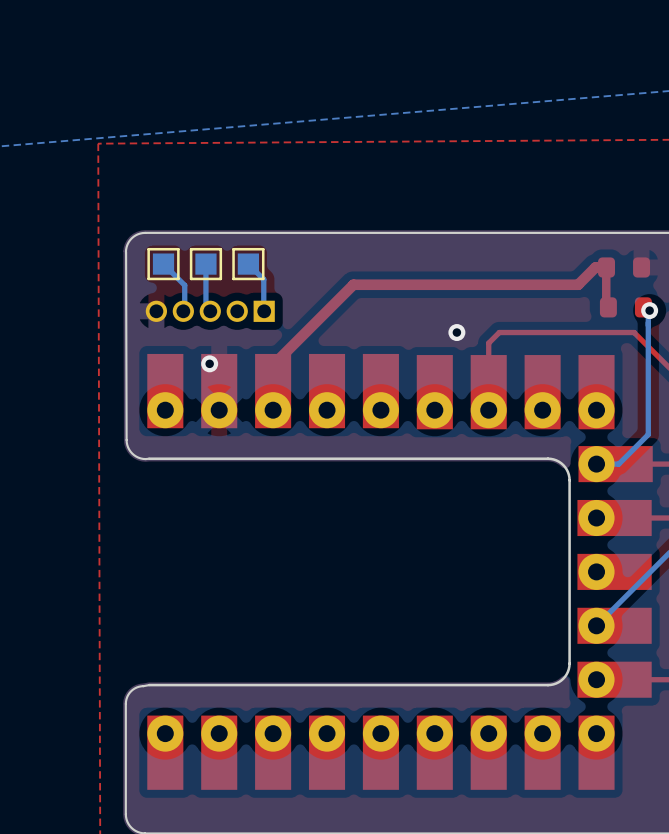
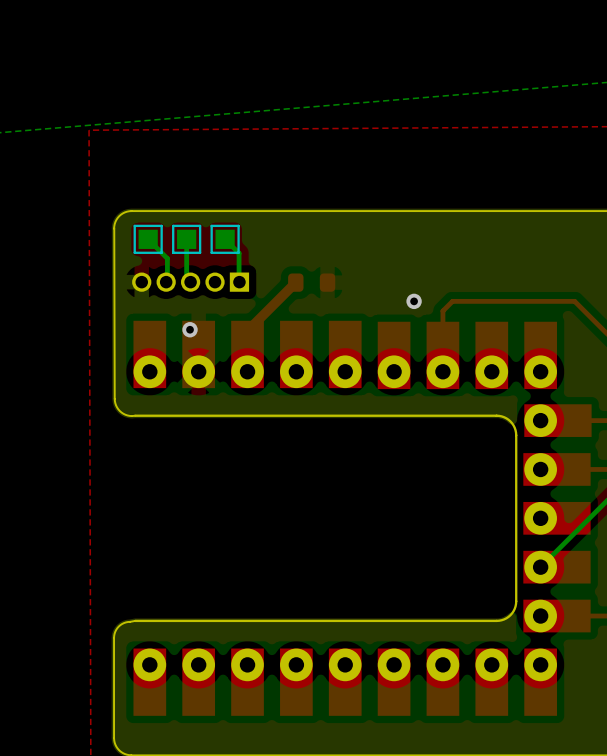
top track: (606, 267) (606, 303) -> none
part: (624, 267) -> none
top track: (608, 269) (606, 267) (595, 267) (578, 284) (353, 284) (326, 311) -> none
part: (625, 307) -> none
bottom track: (649, 310) (648, 434) (618, 464) (596, 464) -> none
via: (649, 310) -> none
part: none -> (311, 282)

